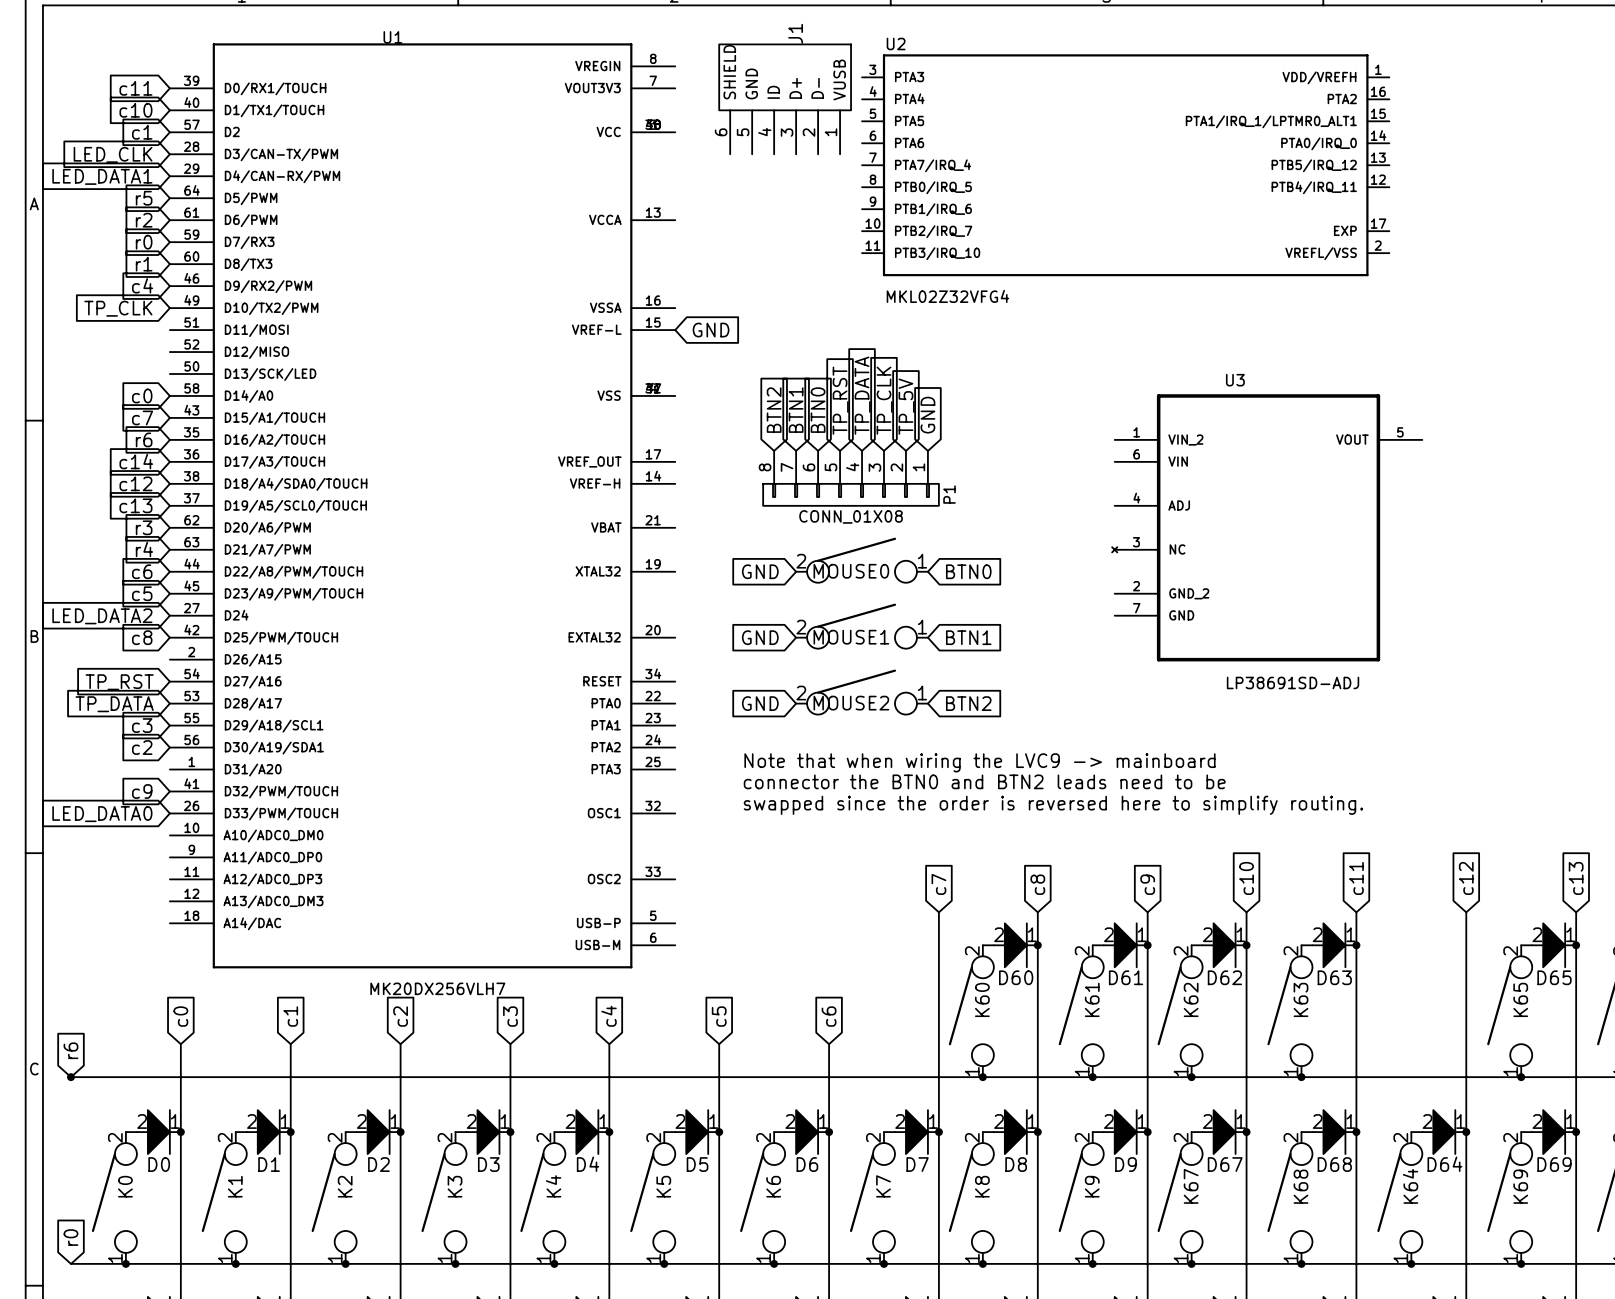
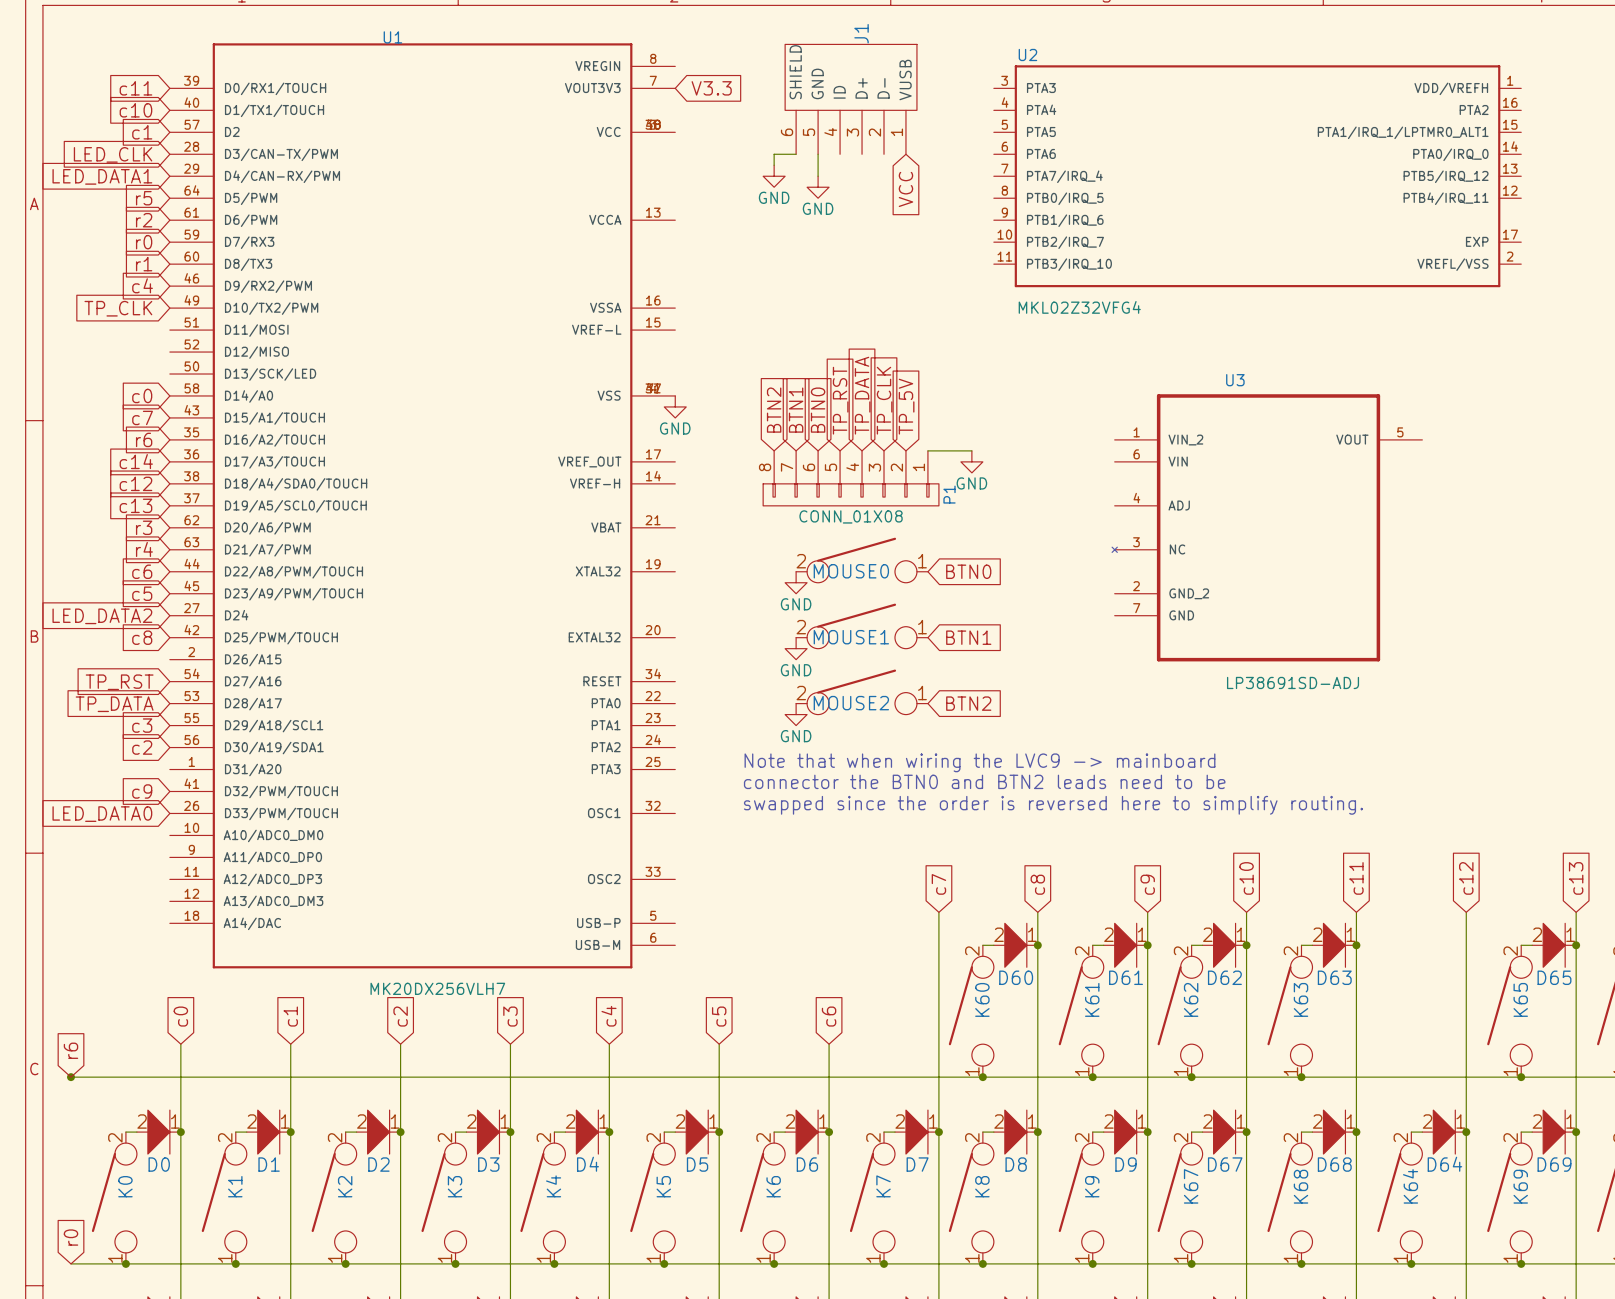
global label: none -> V3.3 (711, 88)
J1 position: (785, 99) -> (851, 99)
wire: none -> (796, 154) (774, 154) (774, 165)
wire: none -> (818, 154) (818, 176)
U2 position: (1125, 165) -> (1257, 176)
power symbol: none -> GND (774, 176)
power symbol: none -> GND (818, 187)
global label: none -> VCC (905, 189)
global label: GND (711, 330) -> none
power symbol: none -> GND (675, 406)
global label: GND (927, 415) -> none
wire: none -> (927, 450) (971, 450)
power symbol: none -> GND (971, 461)
global label: GND (760, 571) -> none
power symbol: none -> GND (796, 582)
global label: GND (760, 637) -> none
power symbol: none -> GND (796, 648)
global label: GND (760, 703) -> none
power symbol: none -> GND (796, 714)

